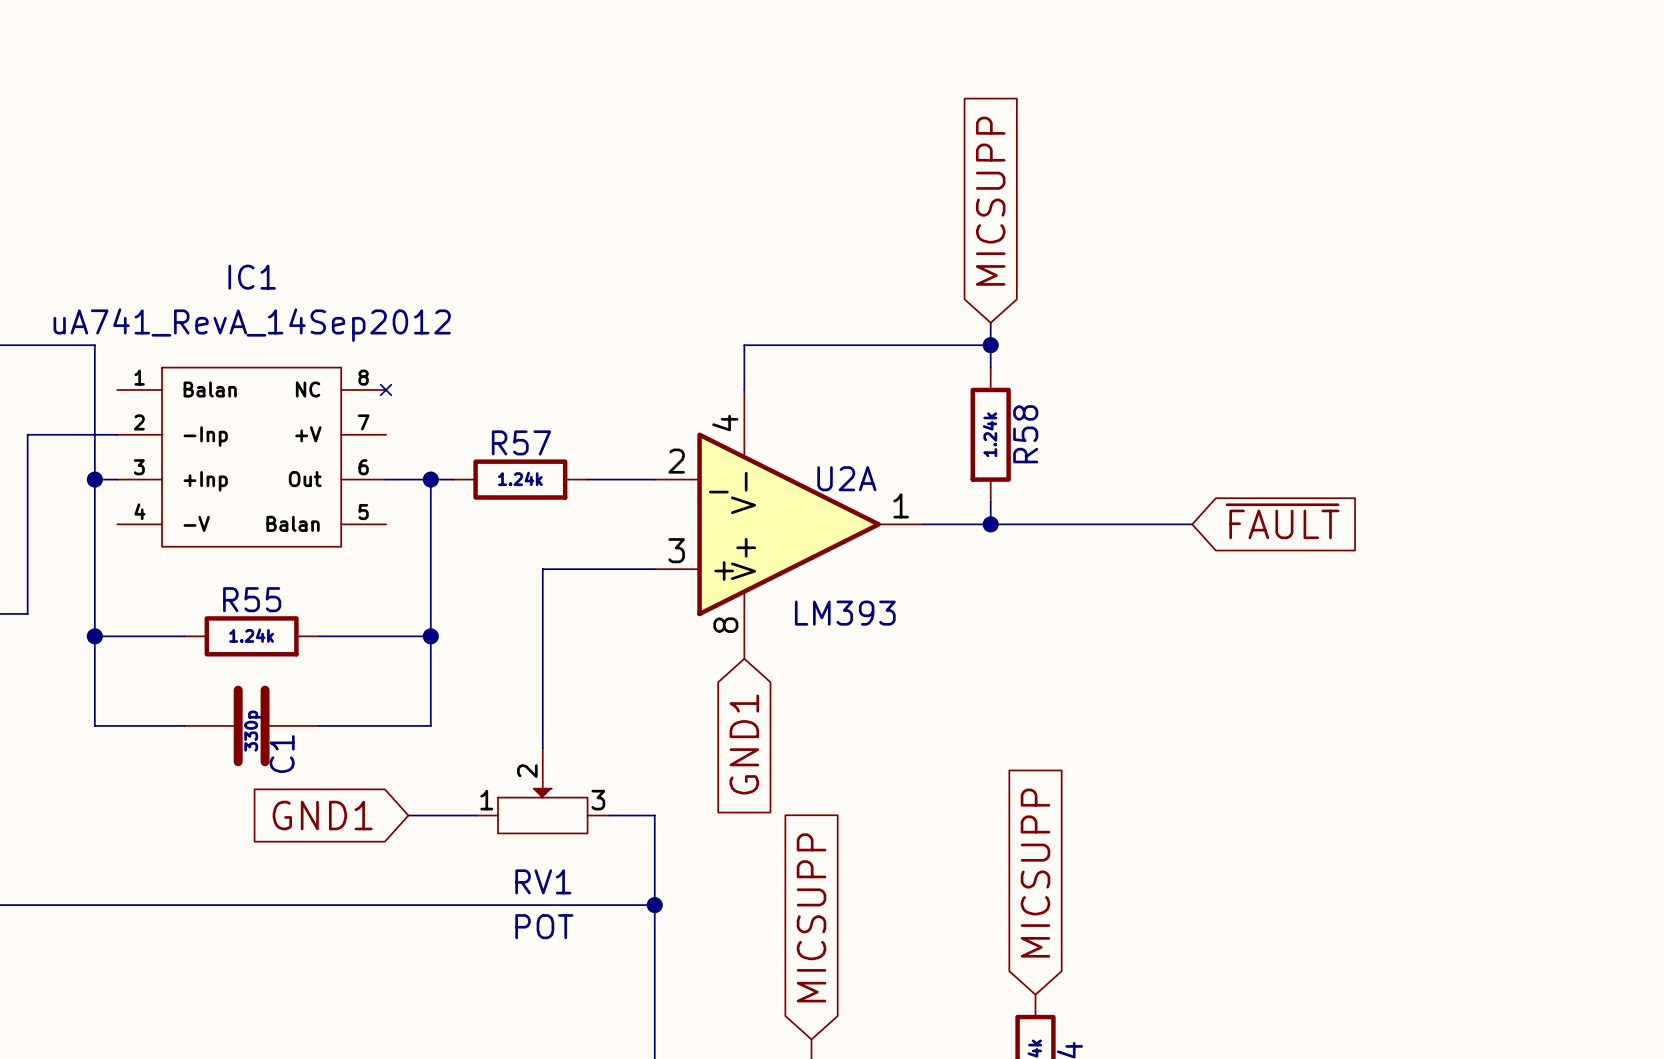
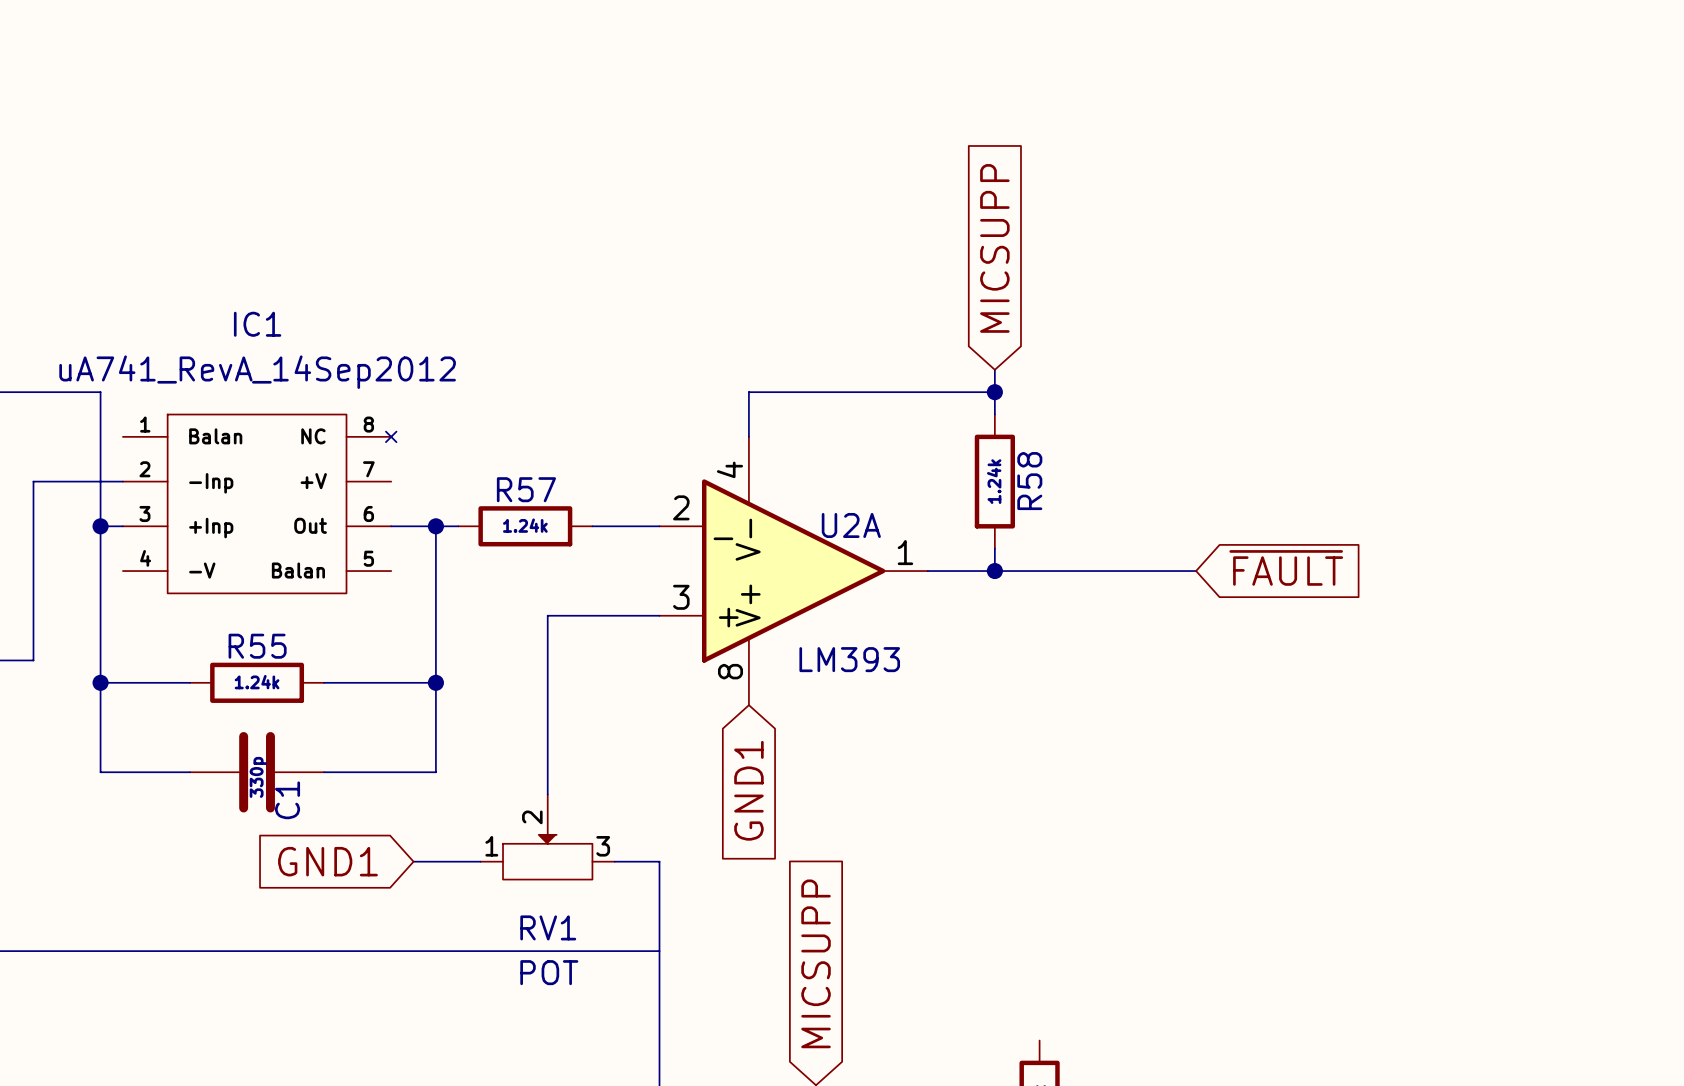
global label: MICSUPP (1035, 873) -> none
junction: (654, 905) -> none

